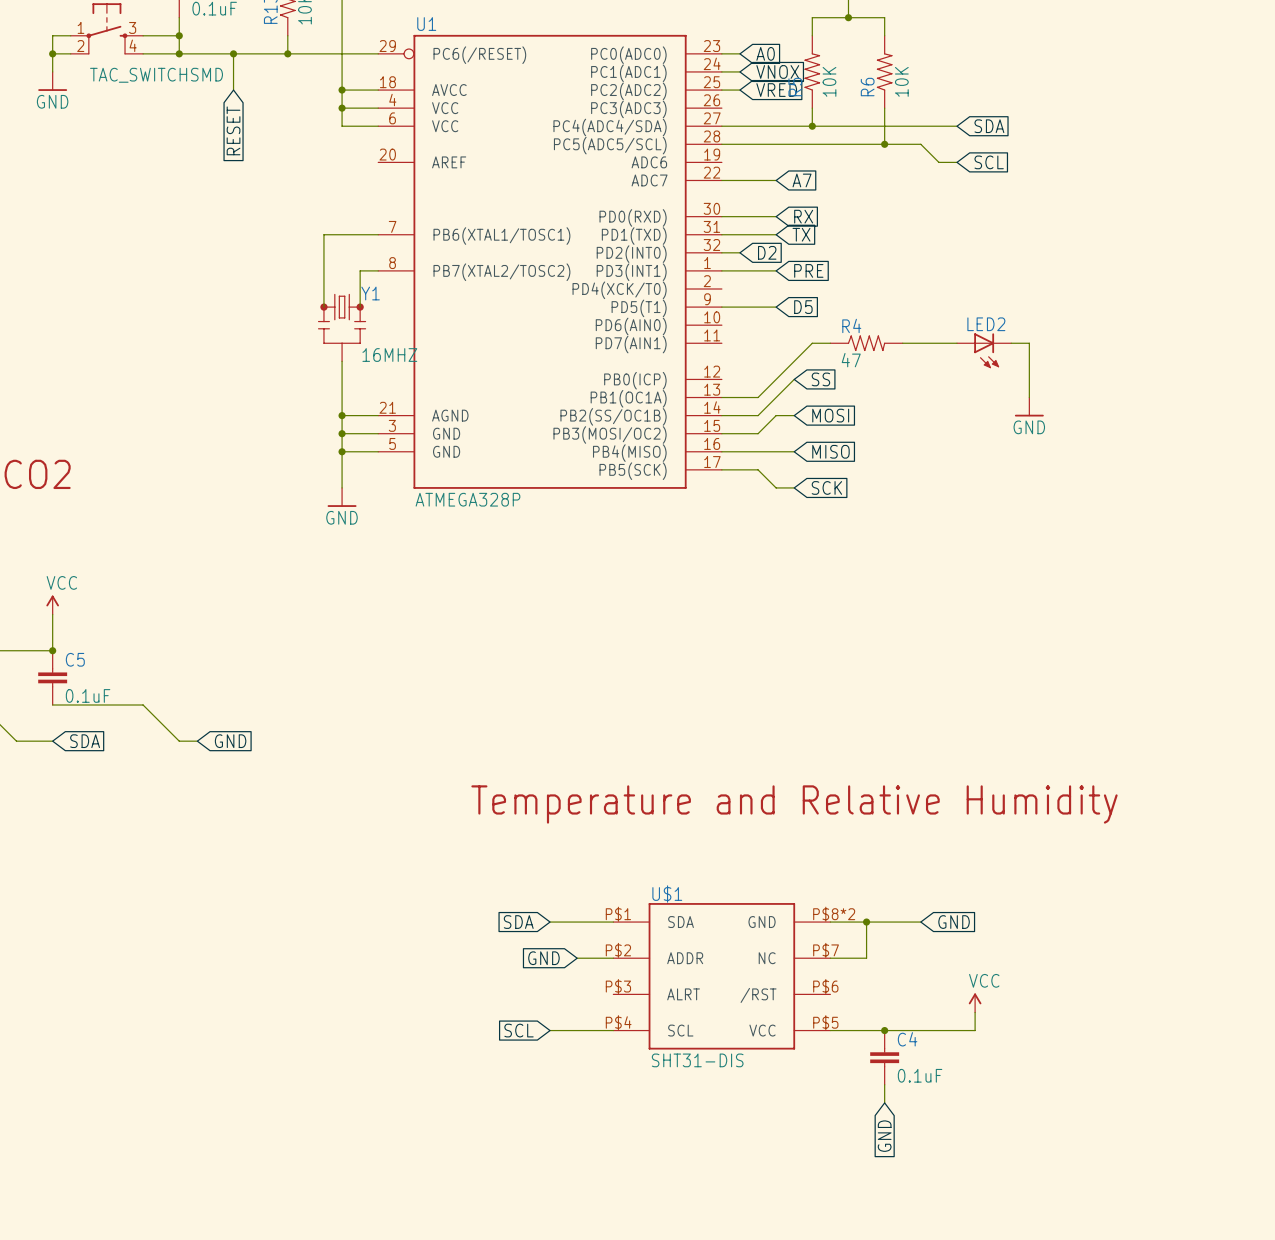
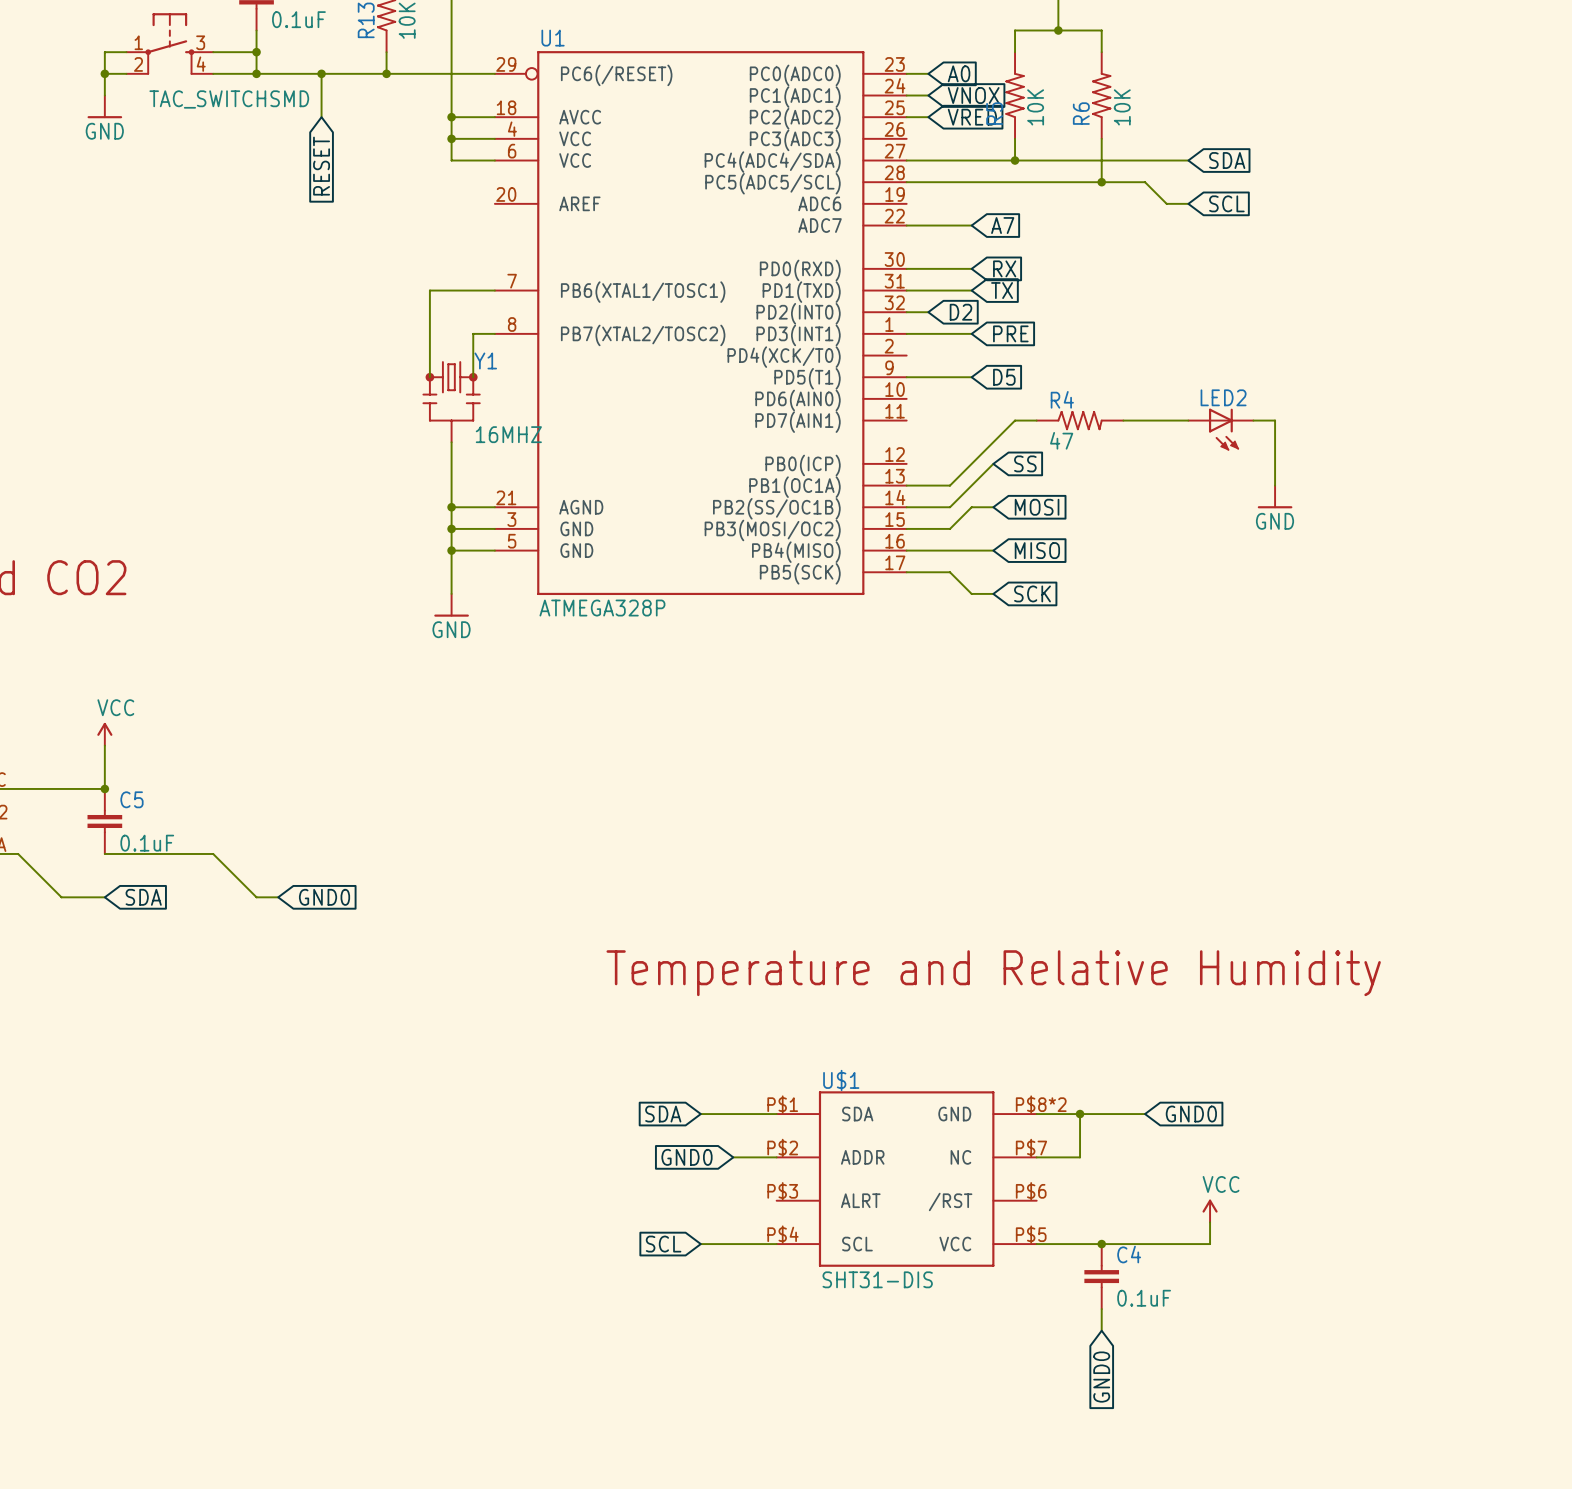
global label: GND (230, 741) -> GND0 (324, 897)
global label: GND (954, 922) -> GND0 (1191, 1114)
global label: GND (543, 958) -> GND0 (686, 1157)
global label: GND (884, 1136) -> GND0 (1101, 1377)

